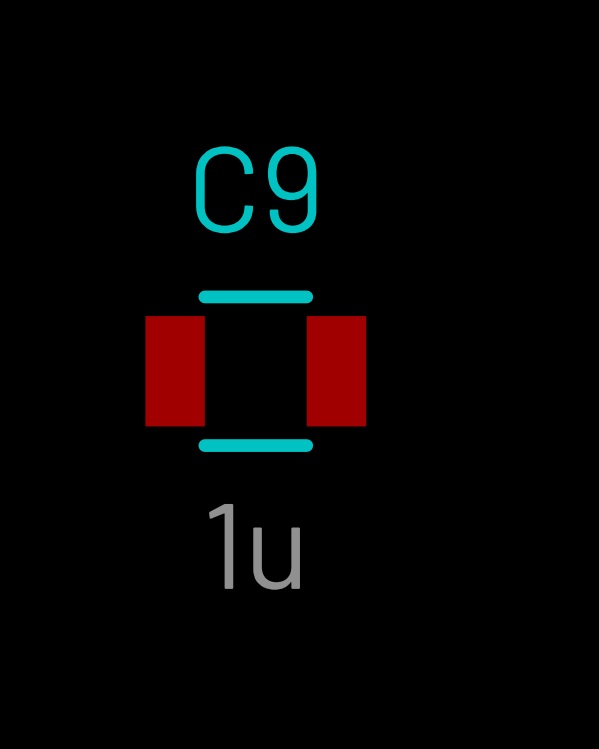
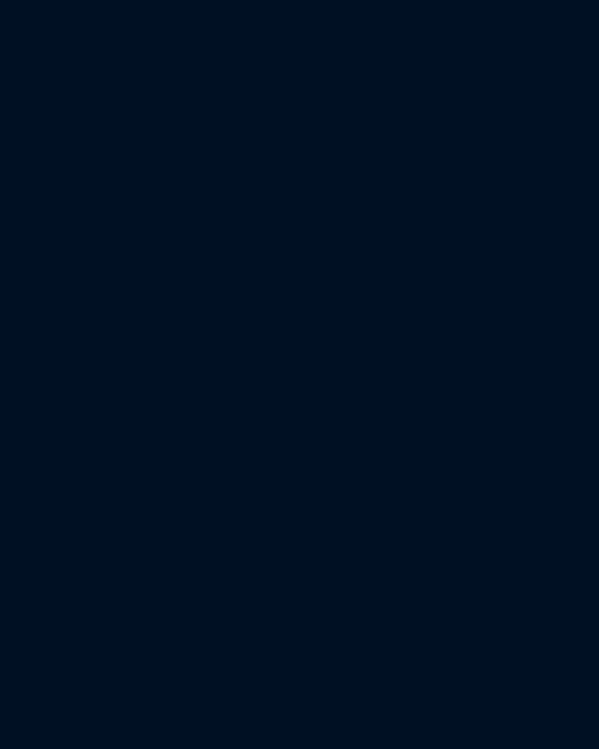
C9: 1u (255, 371) -> none

